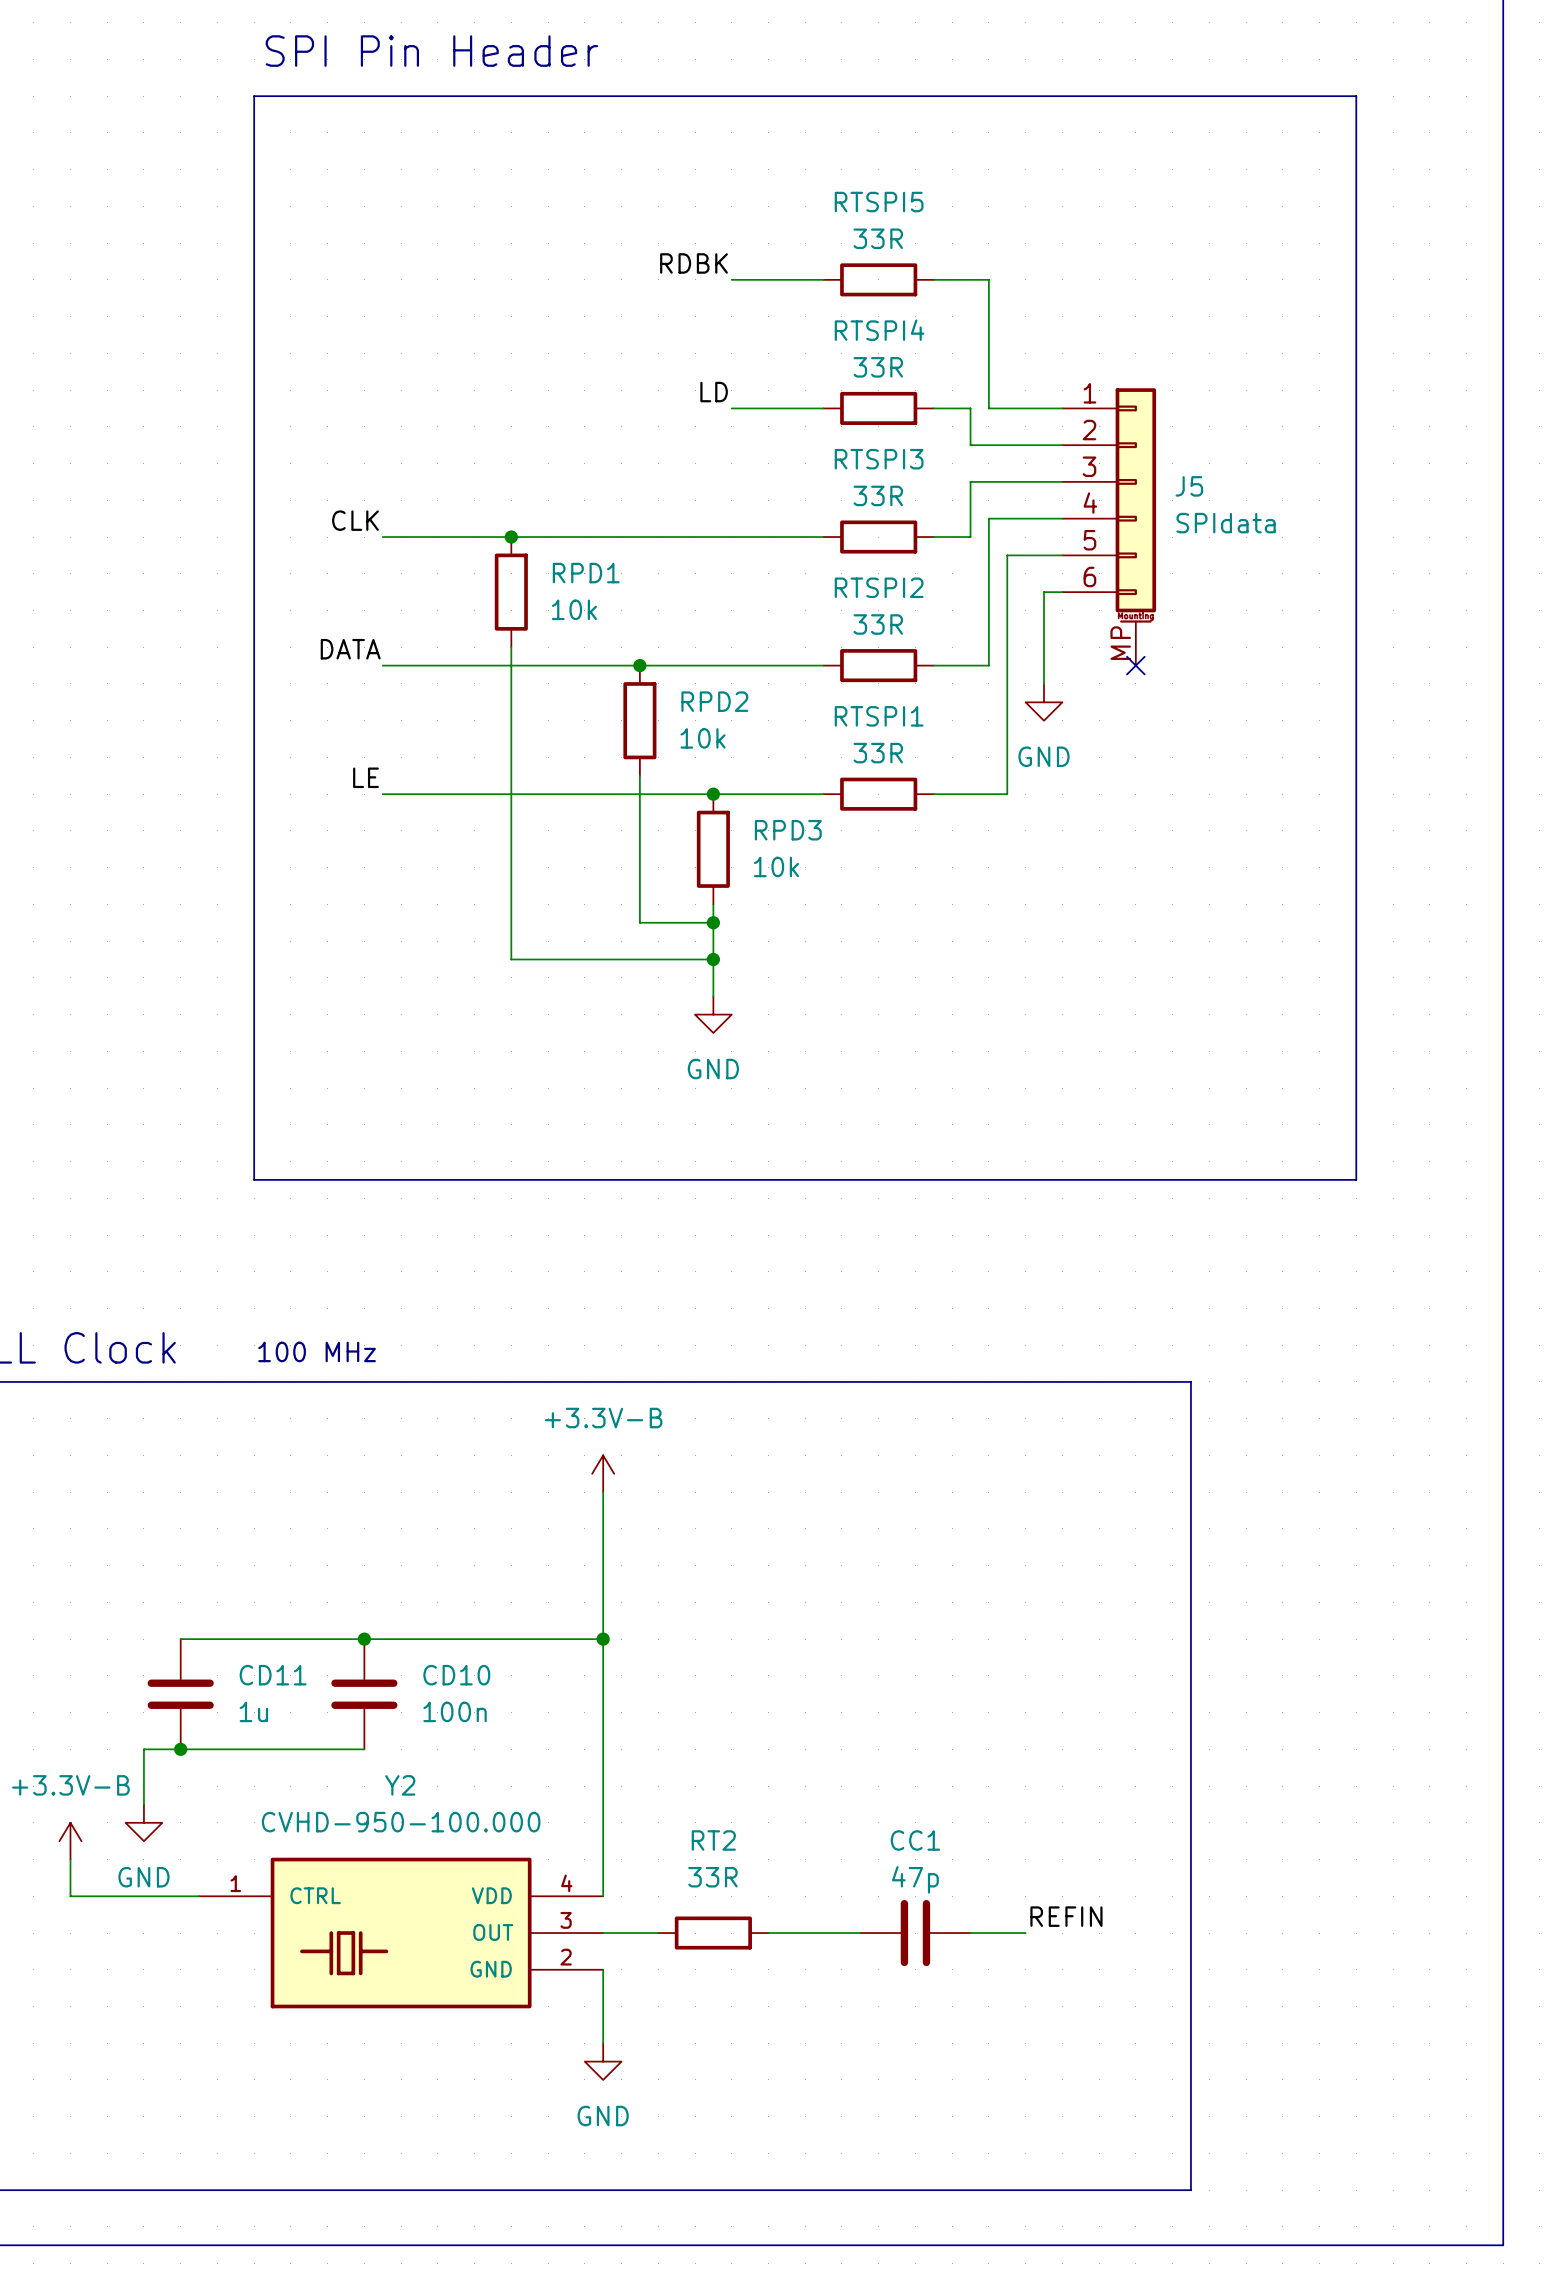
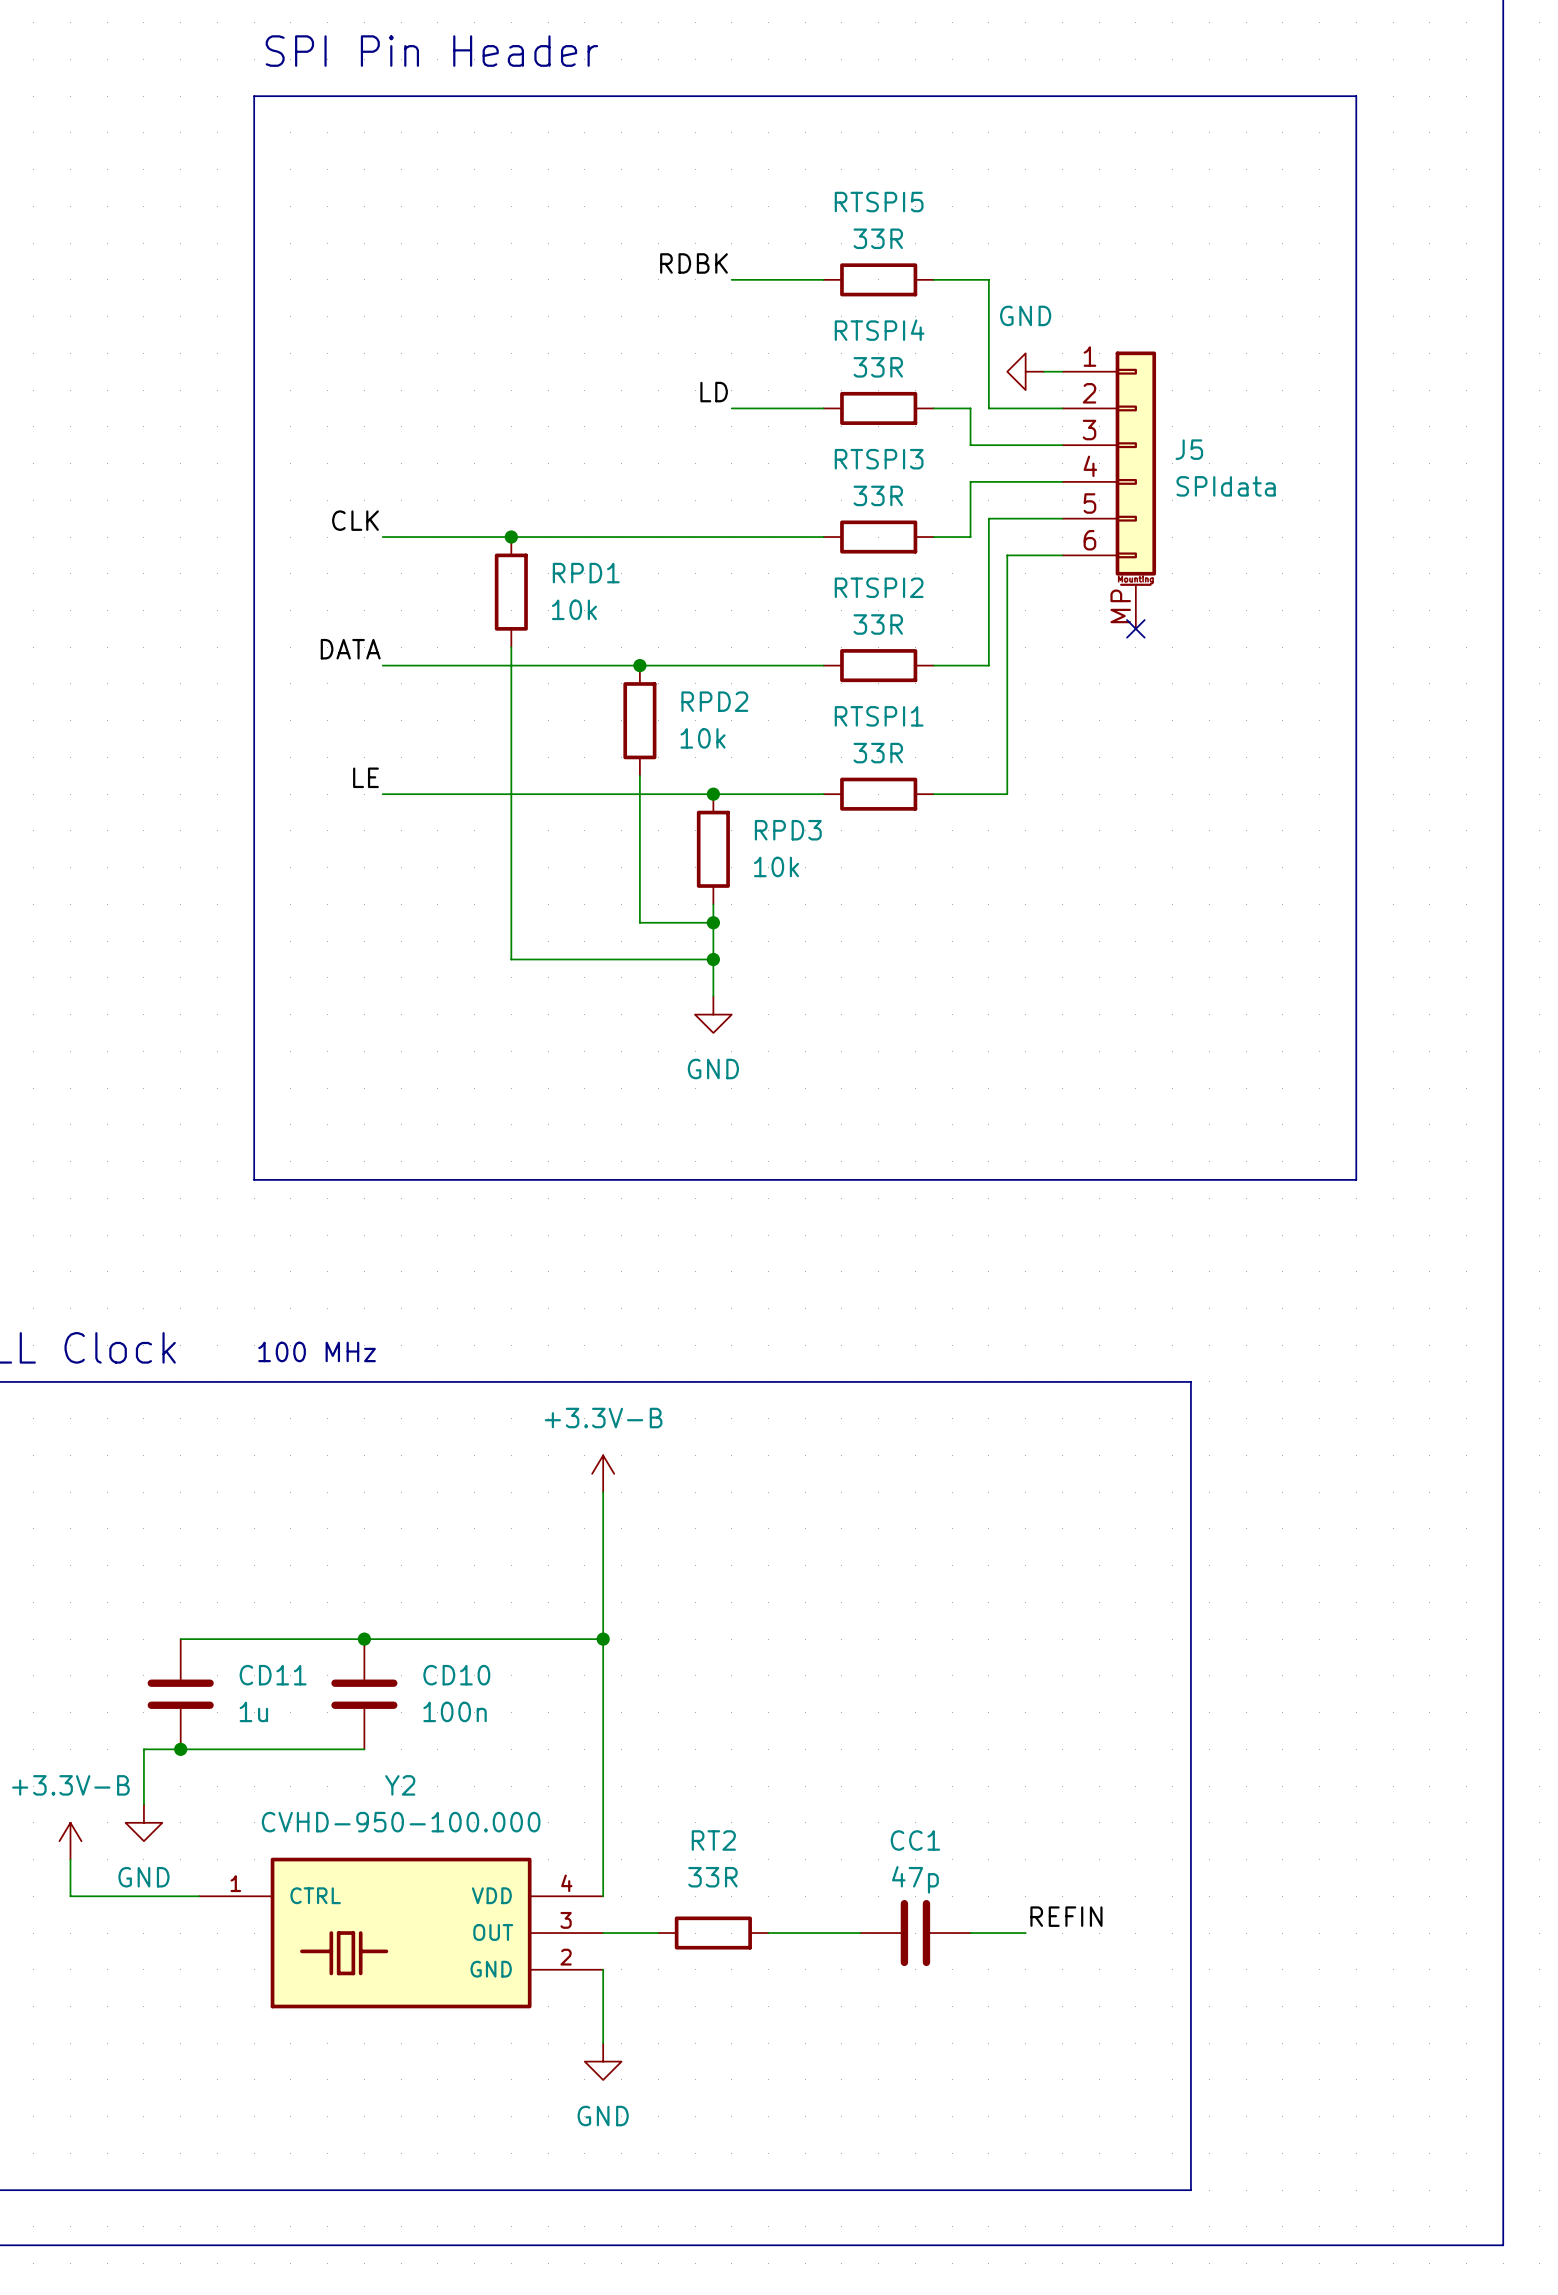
wire: none -> (1044, 371) (1062, 371)
J5 position: (1109, 526) -> (1109, 490)
wire: (1062, 592) (1044, 592) (1044, 683) -> none
no-connect mark position: (1135, 665) -> (1135, 628)
power symbol rotation: 0° (1044, 702) -> 90° clockwise (1025, 371)
power symbol position: GND (1044, 702) -> GND (1025, 371)
power symbol text position: GND (1044, 756) -> GND (1025, 315)

